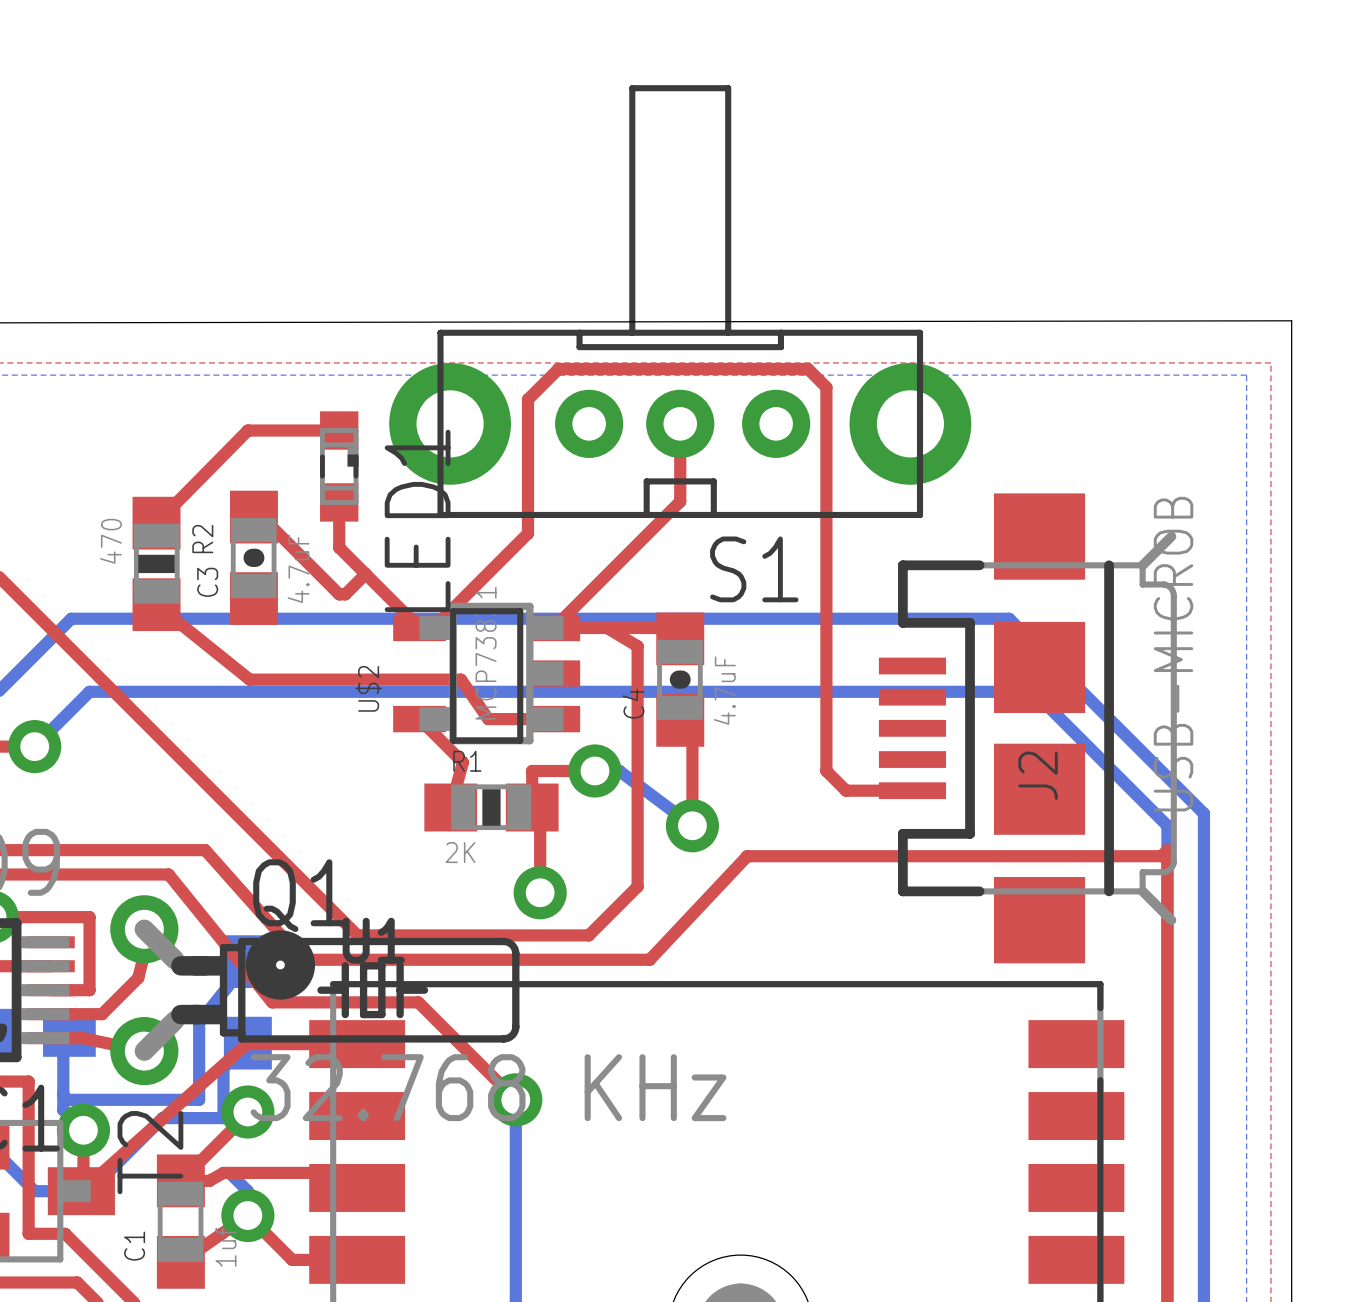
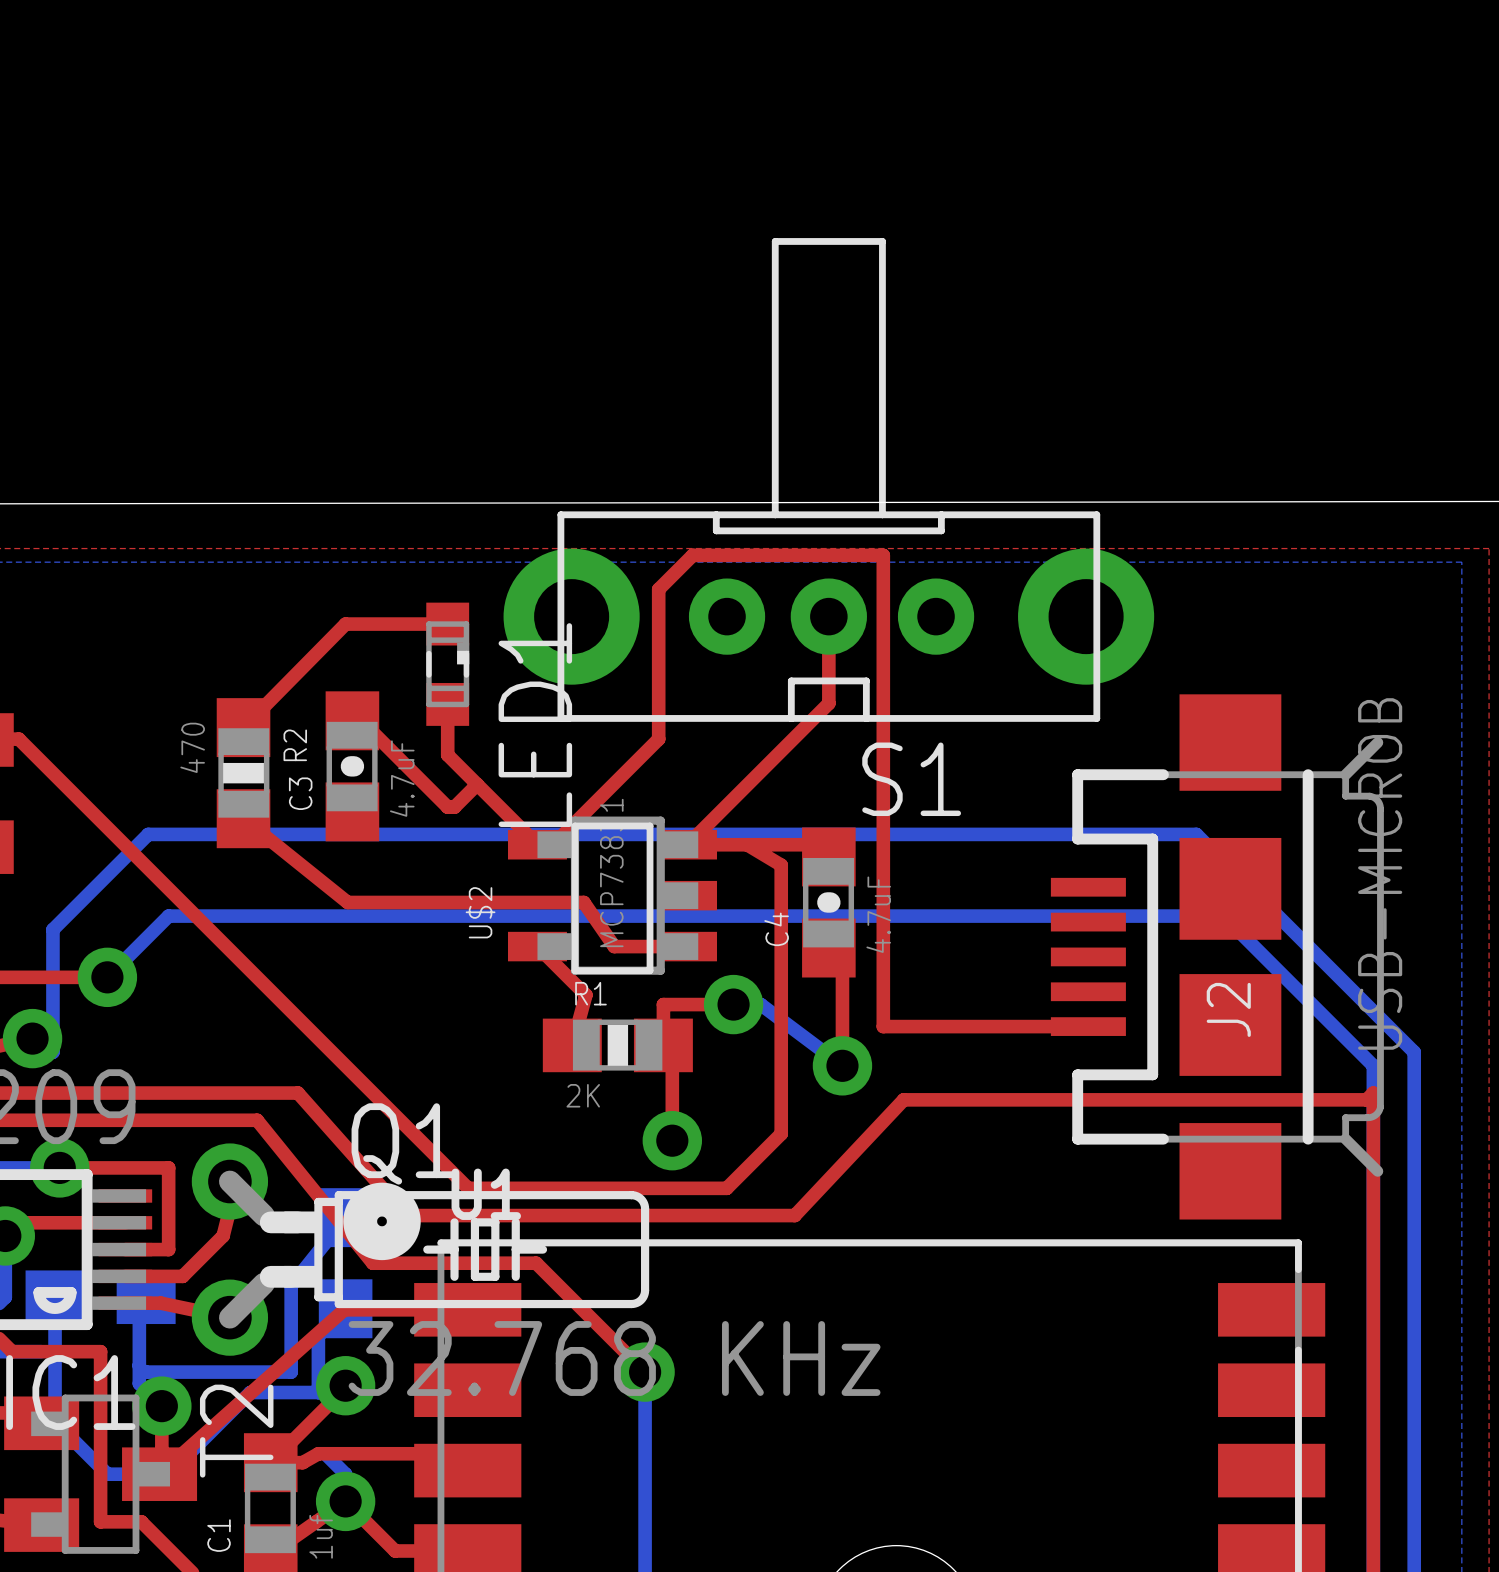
top track: (728, 369) (808, 369) (826, 387) (826, 770) (846, 790) -> (883, 555) (883, 1026) (1014, 1026)

